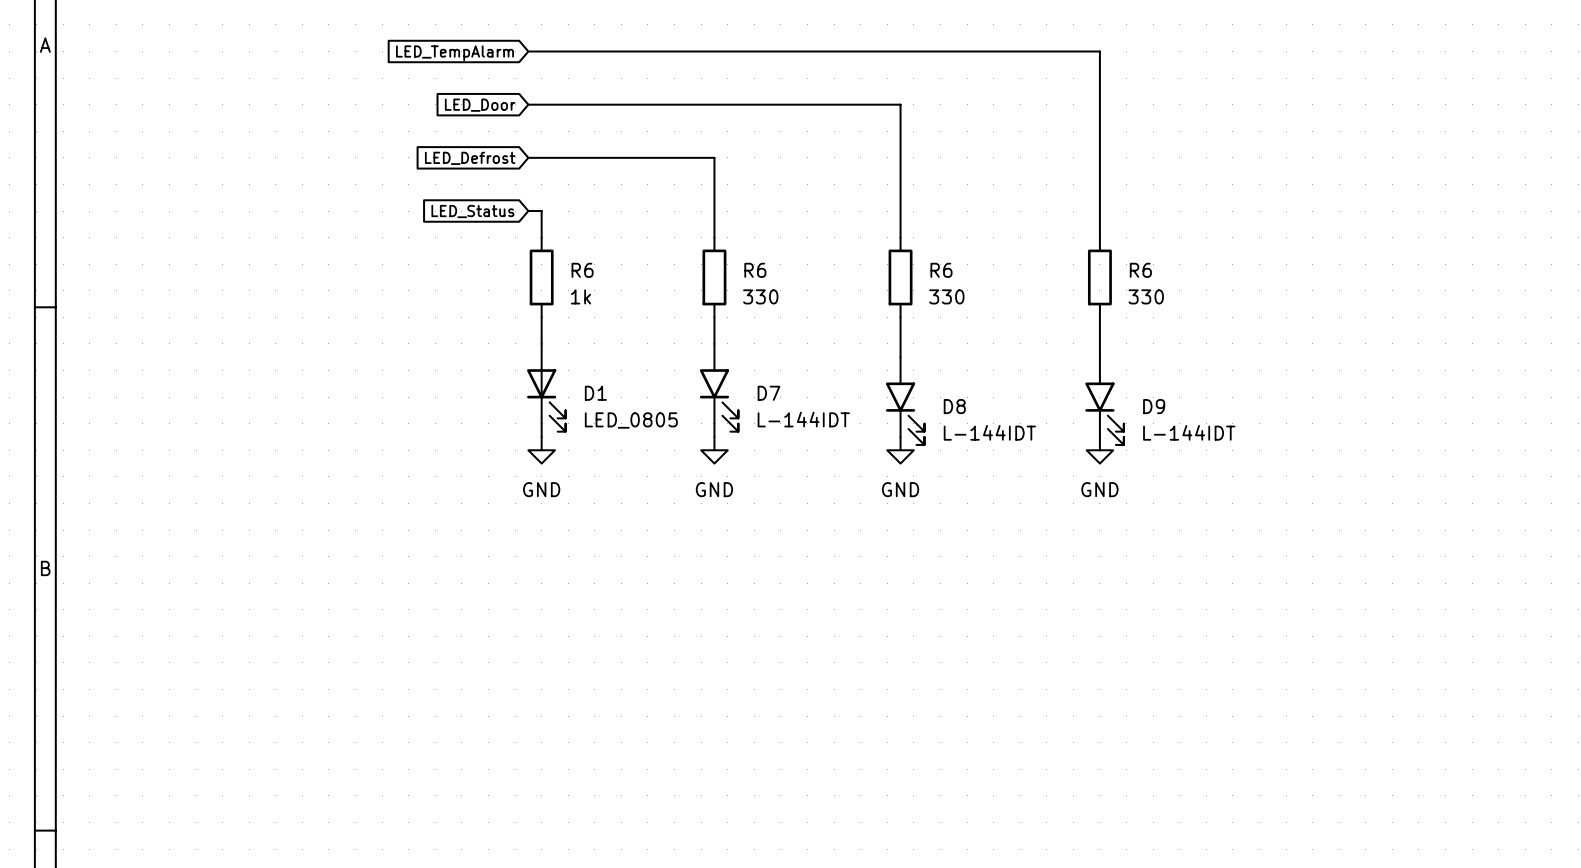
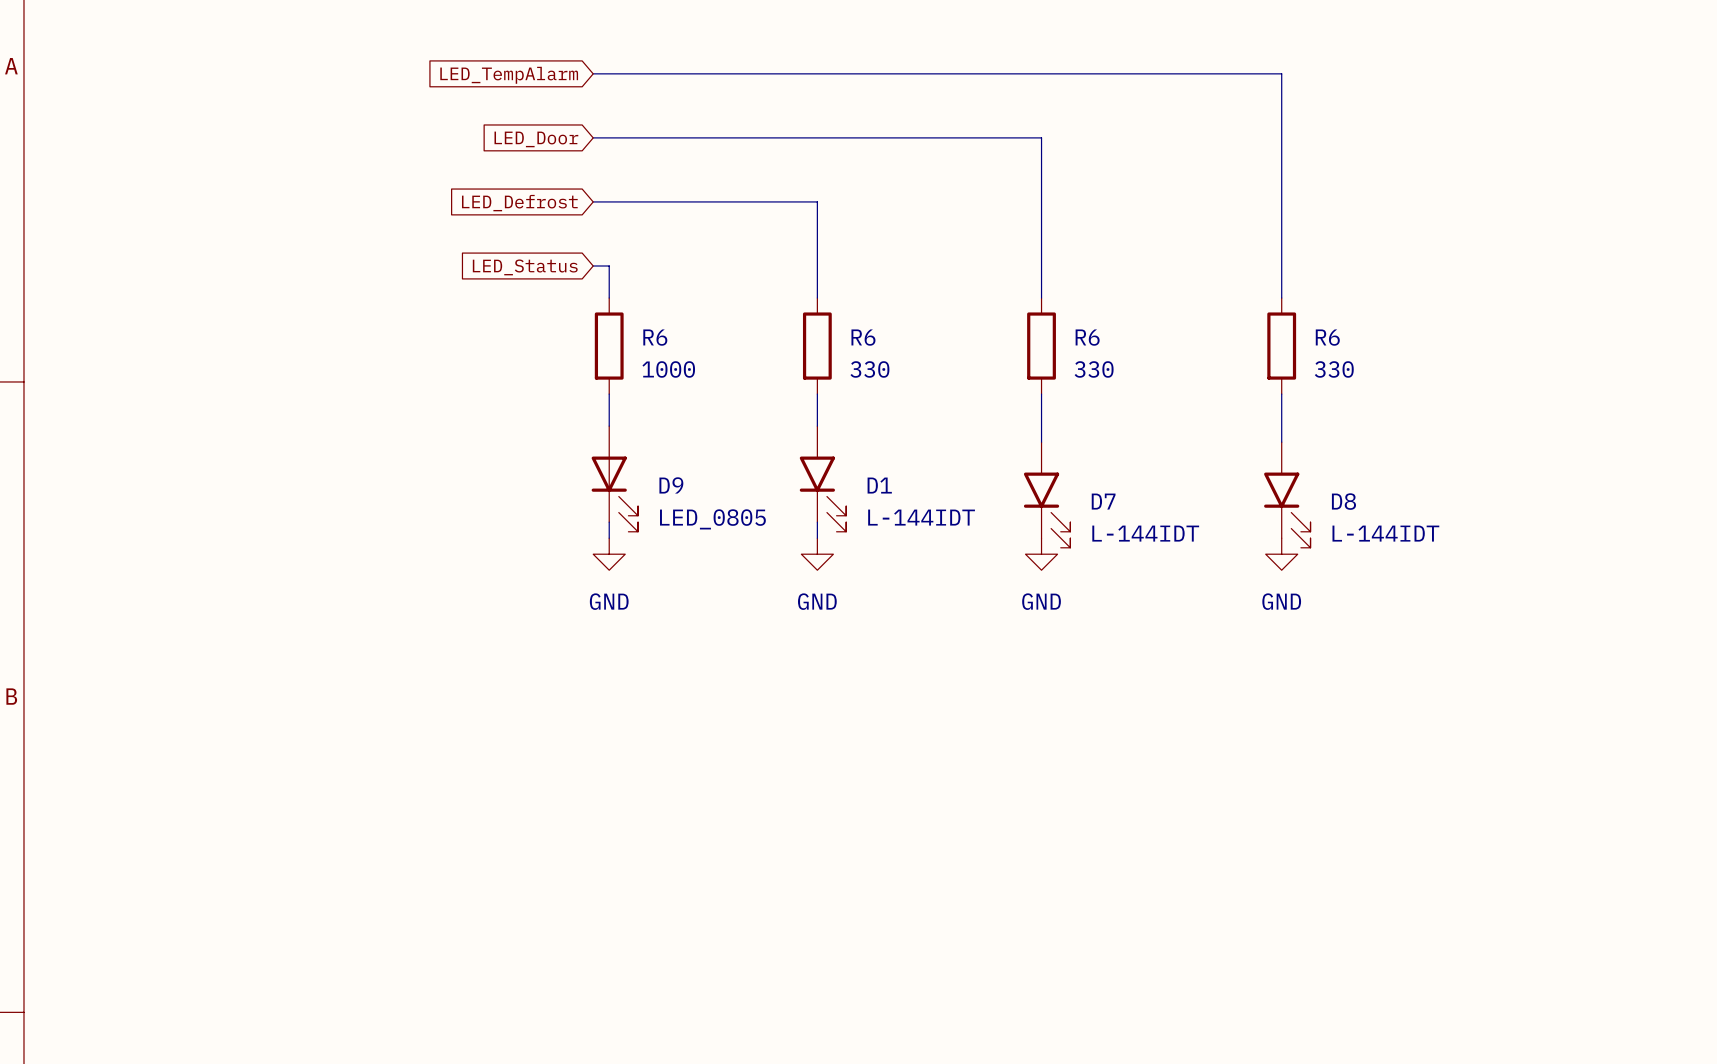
R6 value: 1k (581, 296) -> 1000 (668, 369)
D1 name: D1 (595, 393) -> D9 (671, 485)
D7 name: D7 (768, 393) -> D1 (879, 485)
D8 name: D8 (954, 406) -> D7 (1103, 501)
D9 name: D9 (1154, 406) -> D8 (1343, 501)

